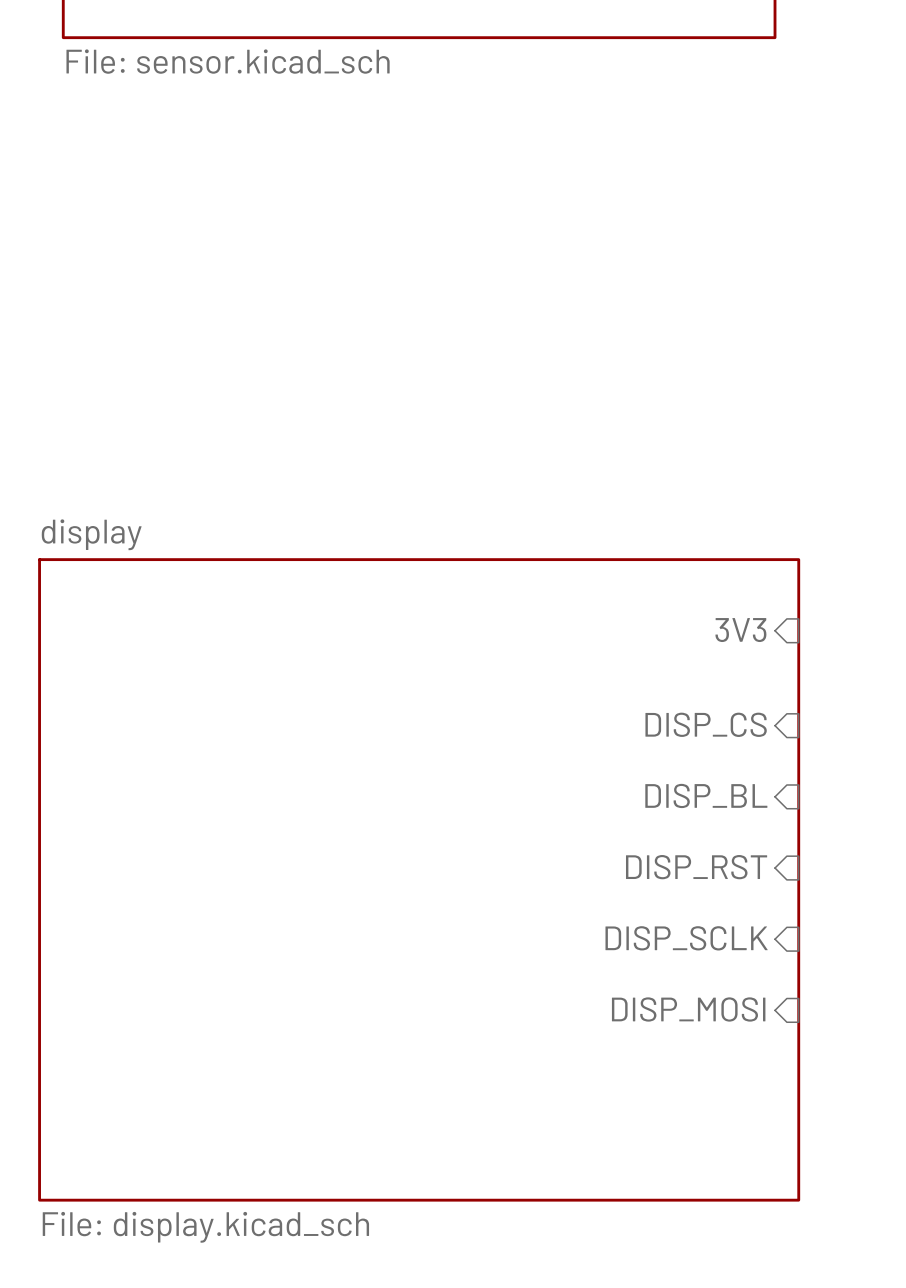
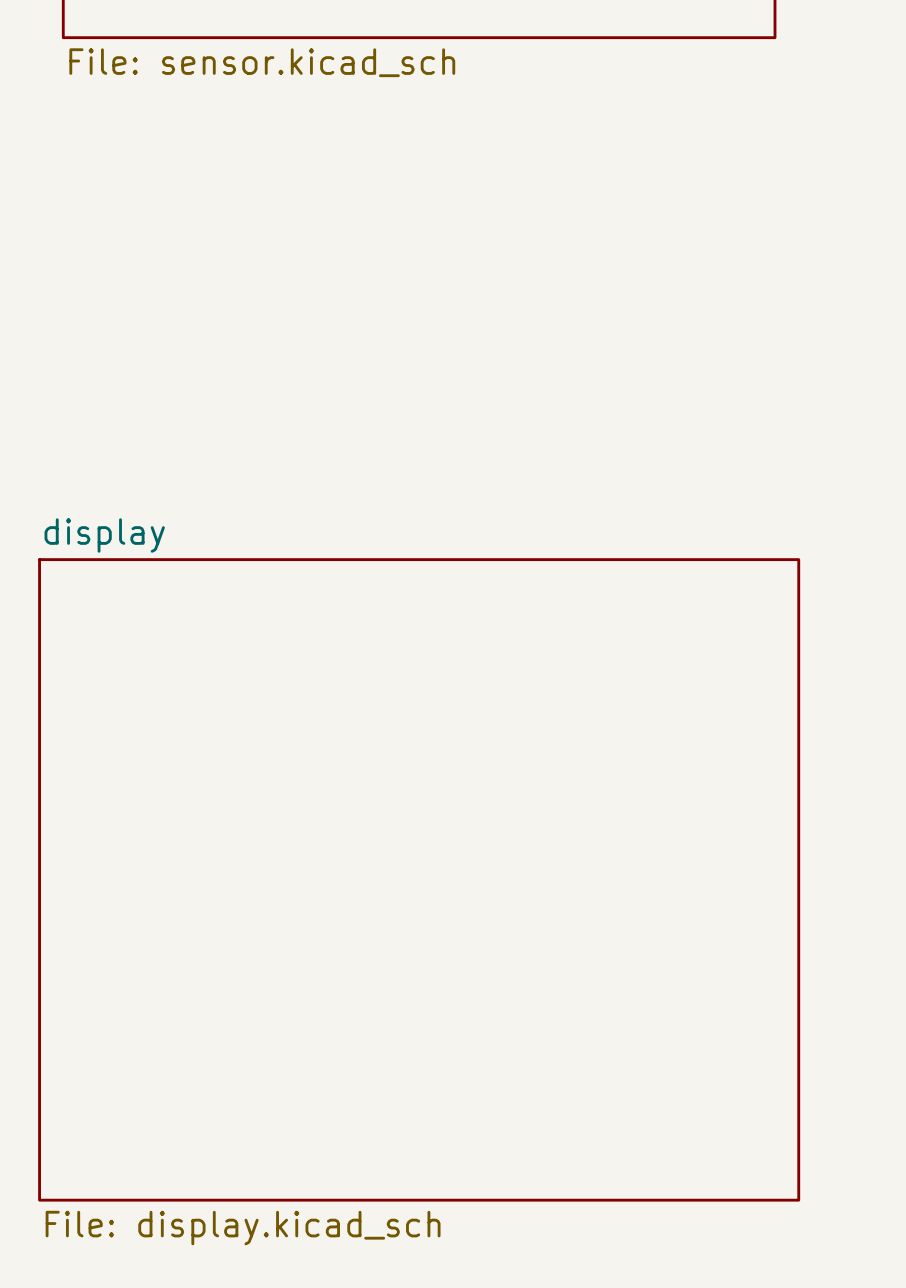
sheet pin: 3V3 (740, 630) -> none
sheet pin: DISP_CS (706, 724) -> none
sheet pin: DISP_BL (706, 795) -> none
sheet pin: DISP_RST (696, 867) -> none
sheet pin: DISP_SCLK (686, 938) -> none
sheet pin: DISP_MOSI (688, 1009) -> none

